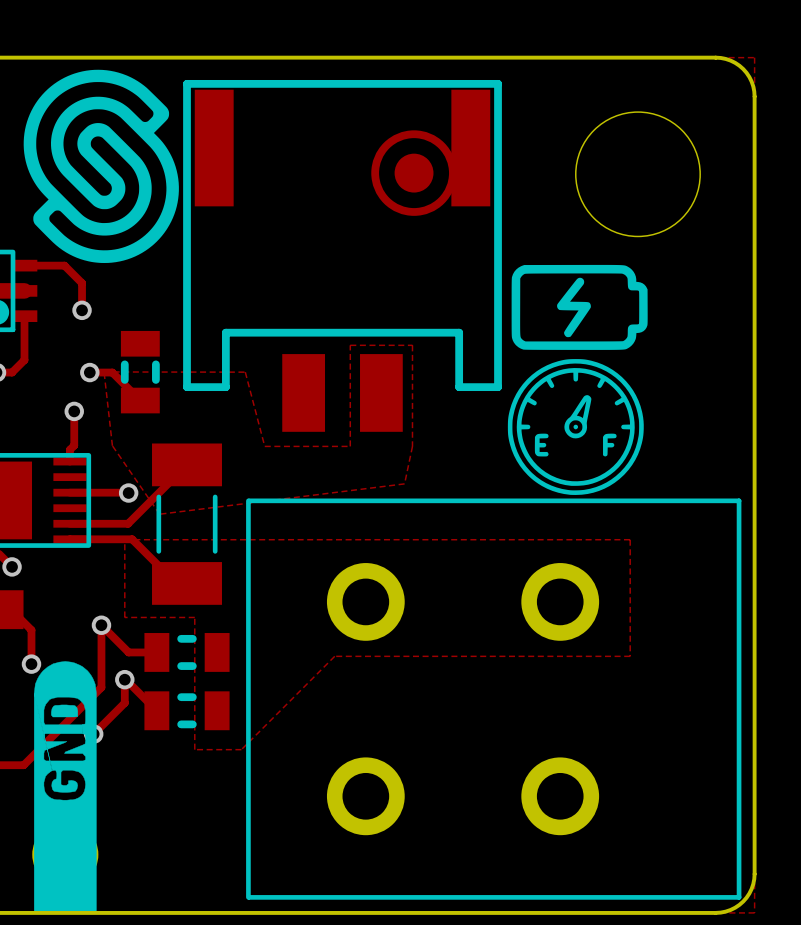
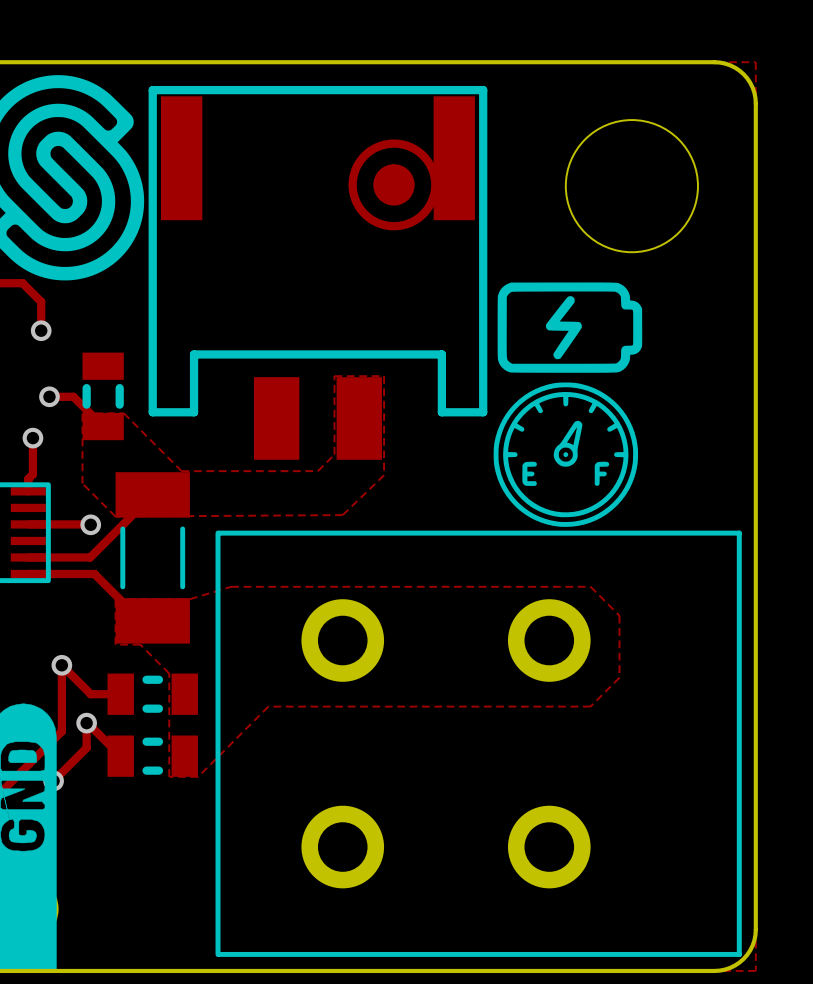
zone outline: (350, 345) (350, 446) (264, 446) (245, 372) (104, 371) (112, 445) (159, 514) (404, 483) (412, 446) (412, 345) (350, 345) -> (334, 376) (334, 454) (317, 471) (181, 471) (123, 413) (82, 413) (82, 483) (115, 516) (342, 515) (384, 475) (384, 376) (334, 376)
zone outline: (124, 539) (124, 617) (194, 617) (194, 749) (241, 749) (334, 656) (630, 656) (630, 539) (124, 539) -> (231, 586) (189, 599) (115, 599) (115, 644) (140, 644) (169, 673) (169, 776) (198, 776) (268, 706) (590, 706) (619, 677) (619, 615) (590, 586) (231, 586)

